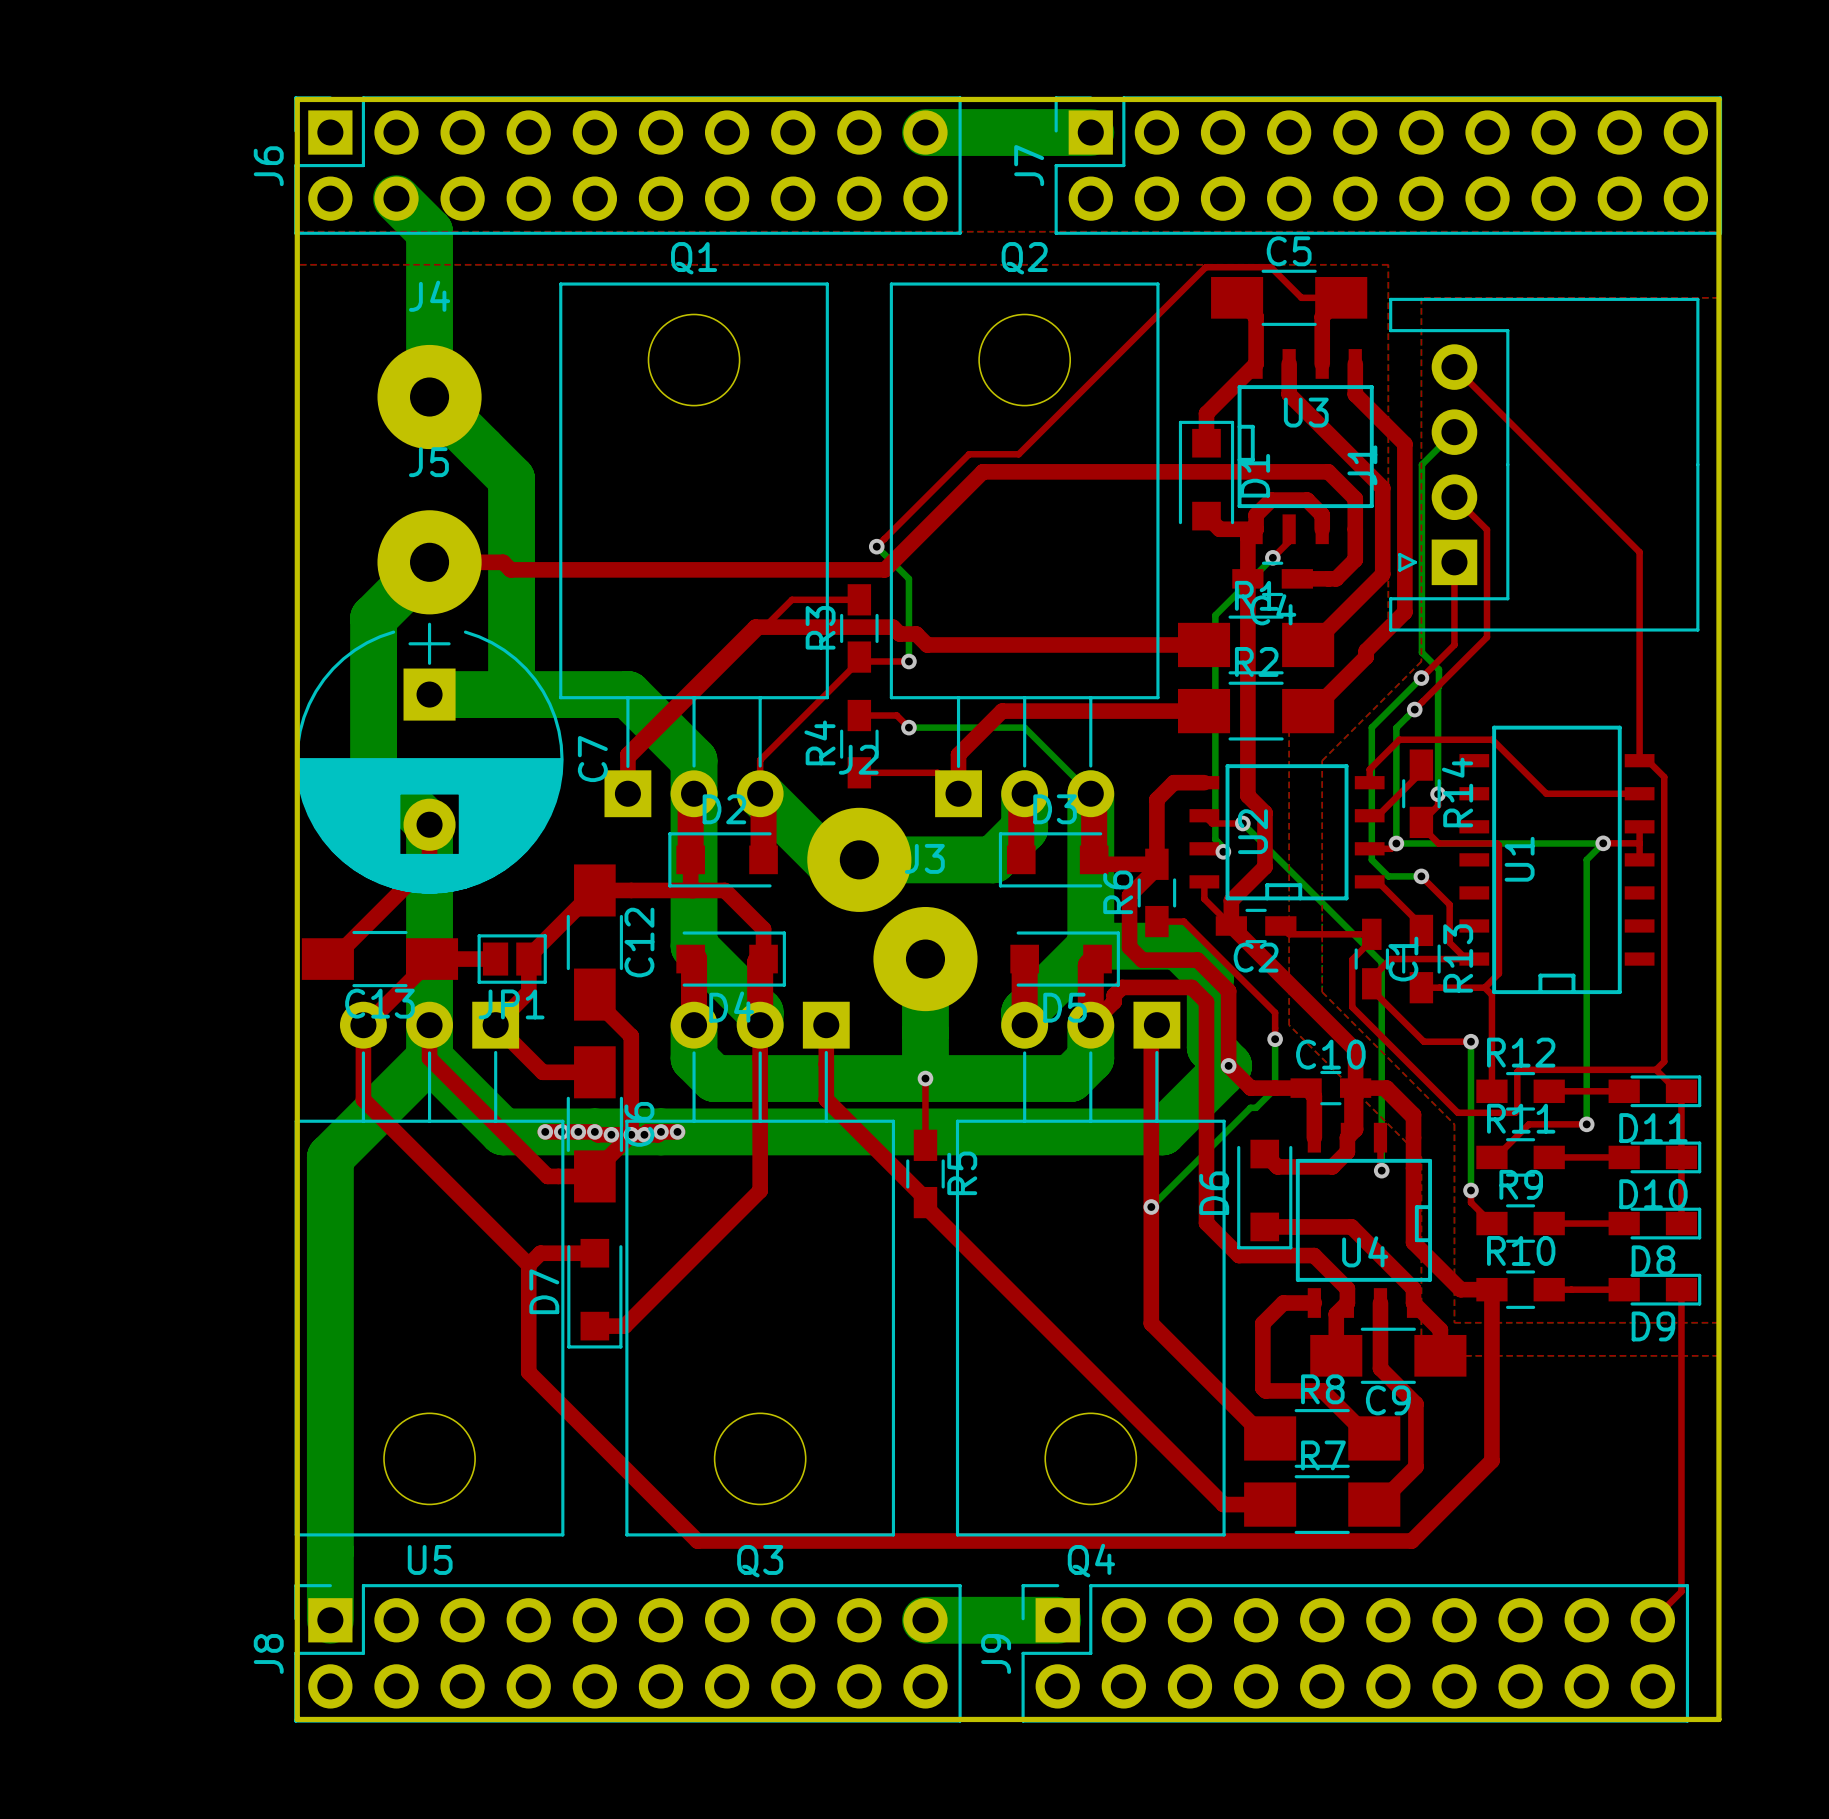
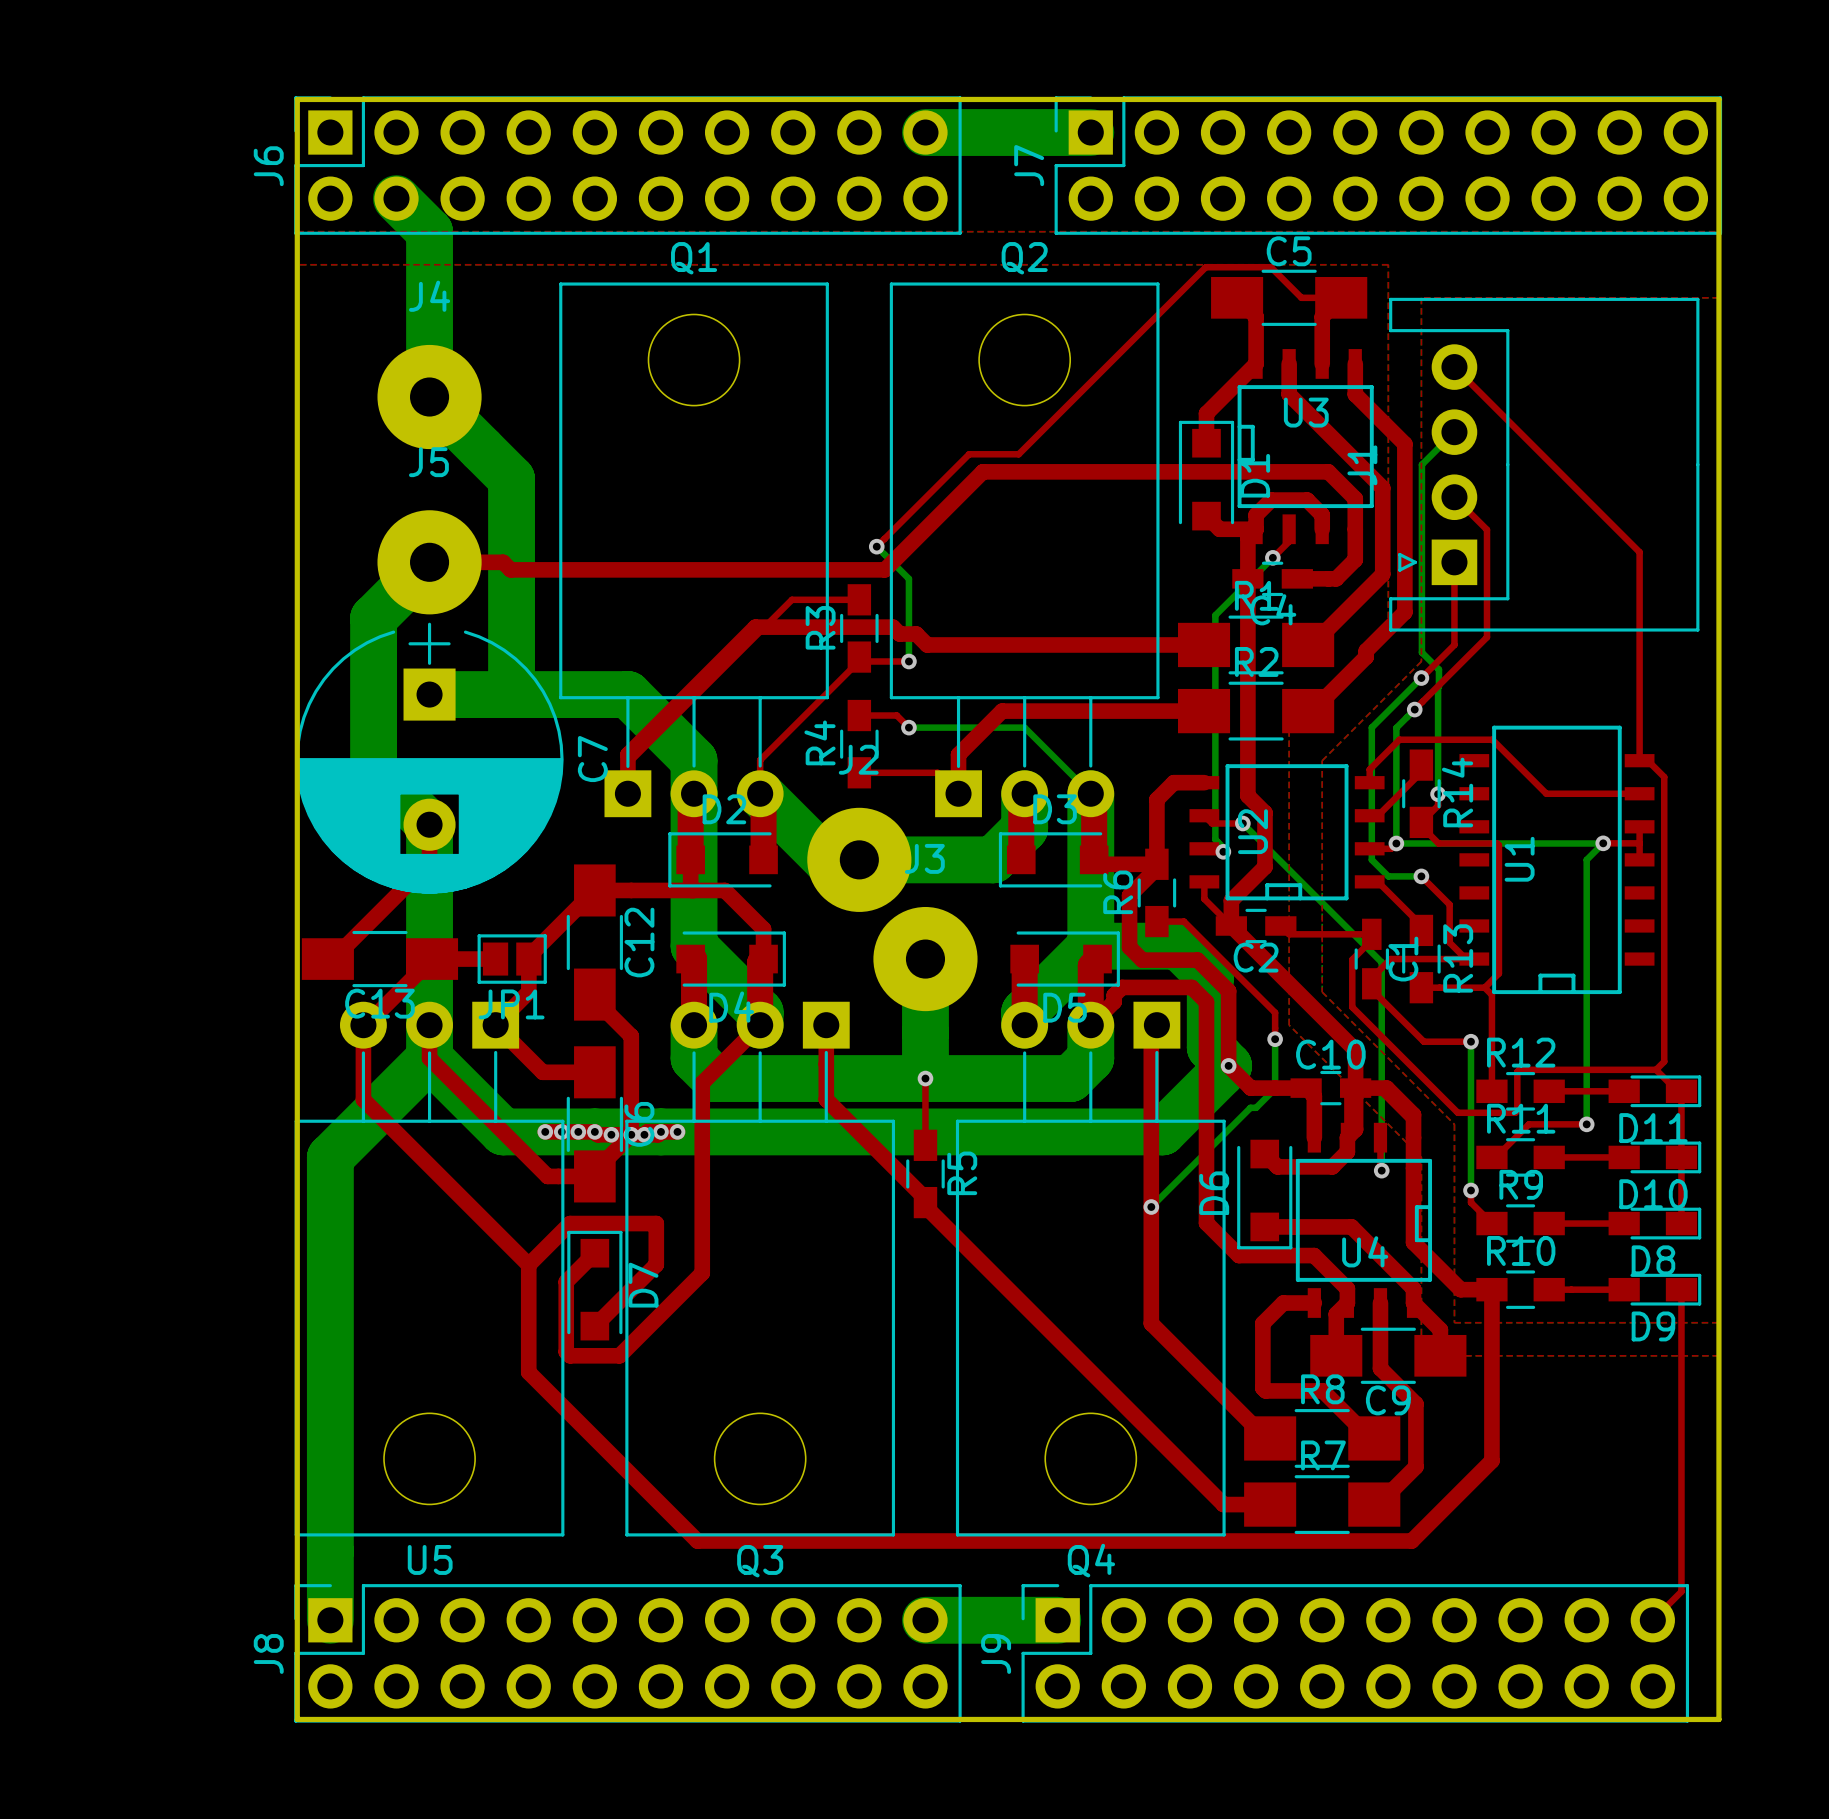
top track: (760, 1025) (760, 1190) (624, 1326) (594, 1326) -> (760, 1025) (702, 1083) (702, 1273) (619, 1355) (570, 1355) (566, 1351) (566, 1281) (594, 1253)
top track: (540, 1253) (594, 1253) -> (540, 1253) (570, 1223) (656, 1223) (656, 1264) (594, 1326)
D7 rotation: 0° (594, 1293) -> 180° (594, 1285)

